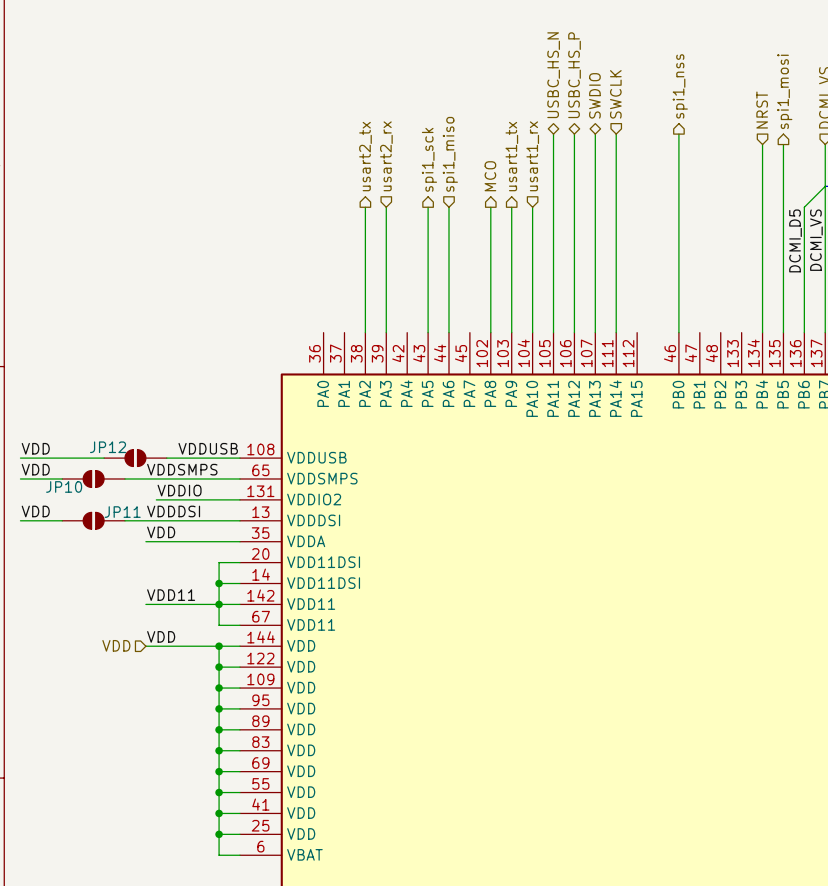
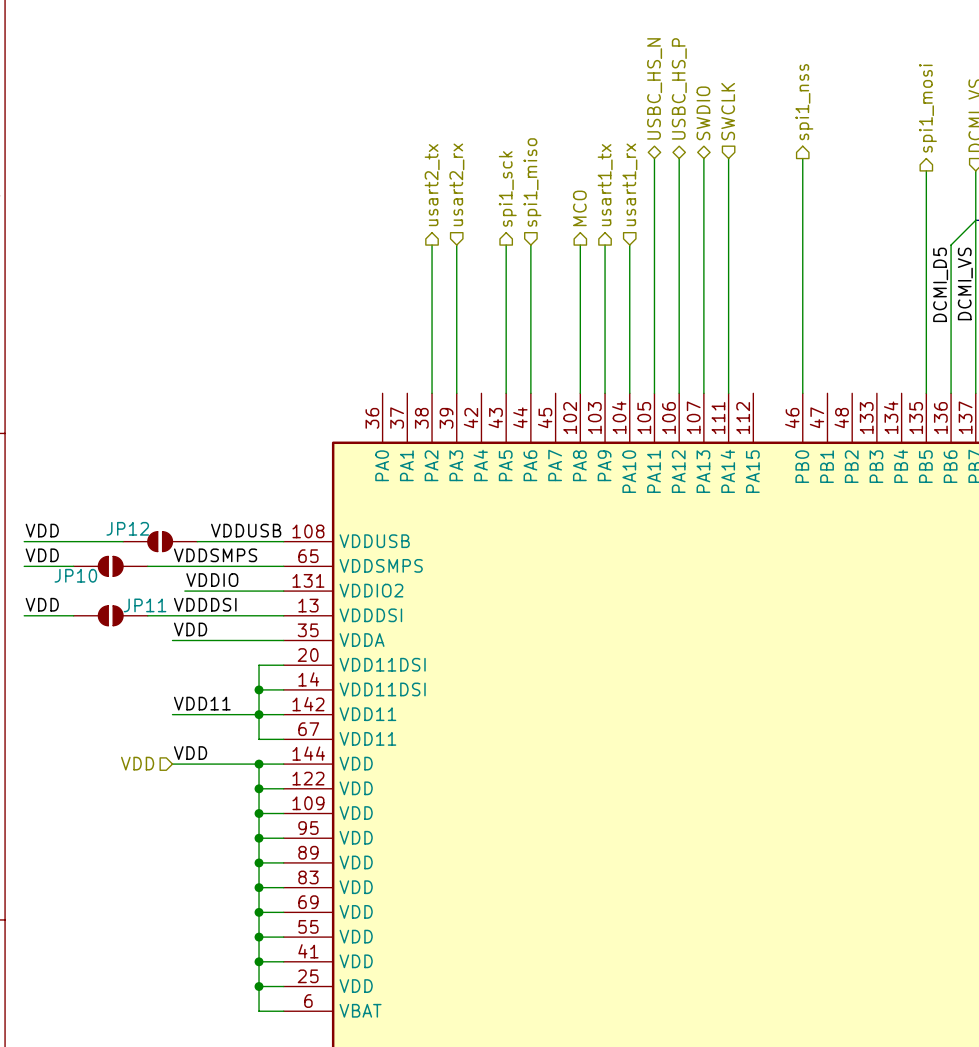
hierarchical label: NRST (762, 110) -> none
wire: (762, 144) (762, 332) -> none

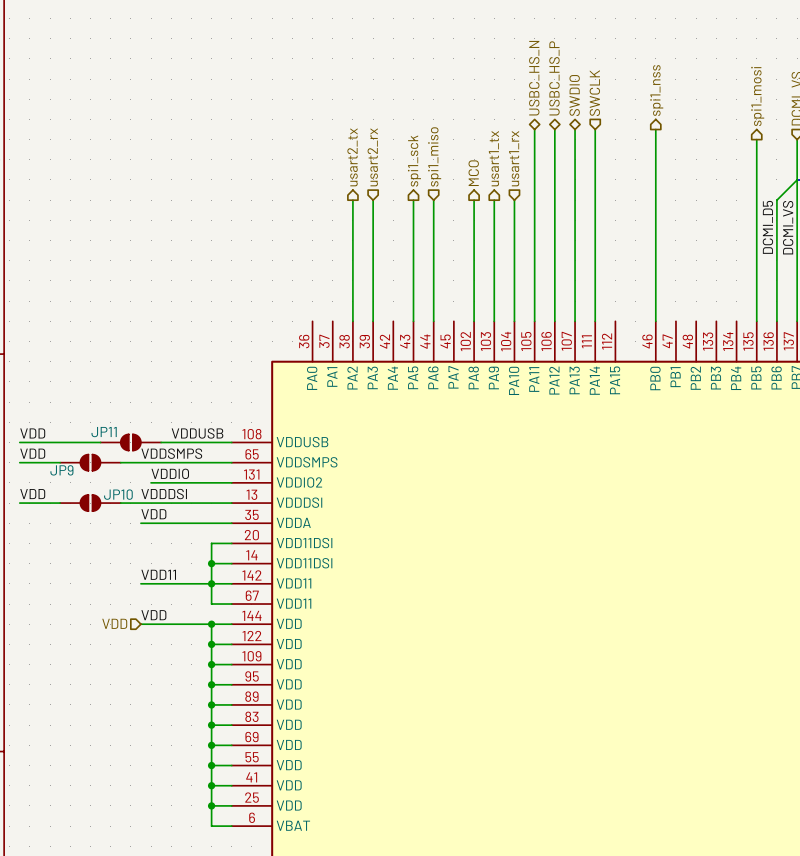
JP12 name: JP12 (127, 528) -> JP11 (104, 432)
JP10 name: JP10 (75, 575) -> JP9 (61, 470)
JP11 name: JP11 (145, 605) -> JP10 (118, 494)

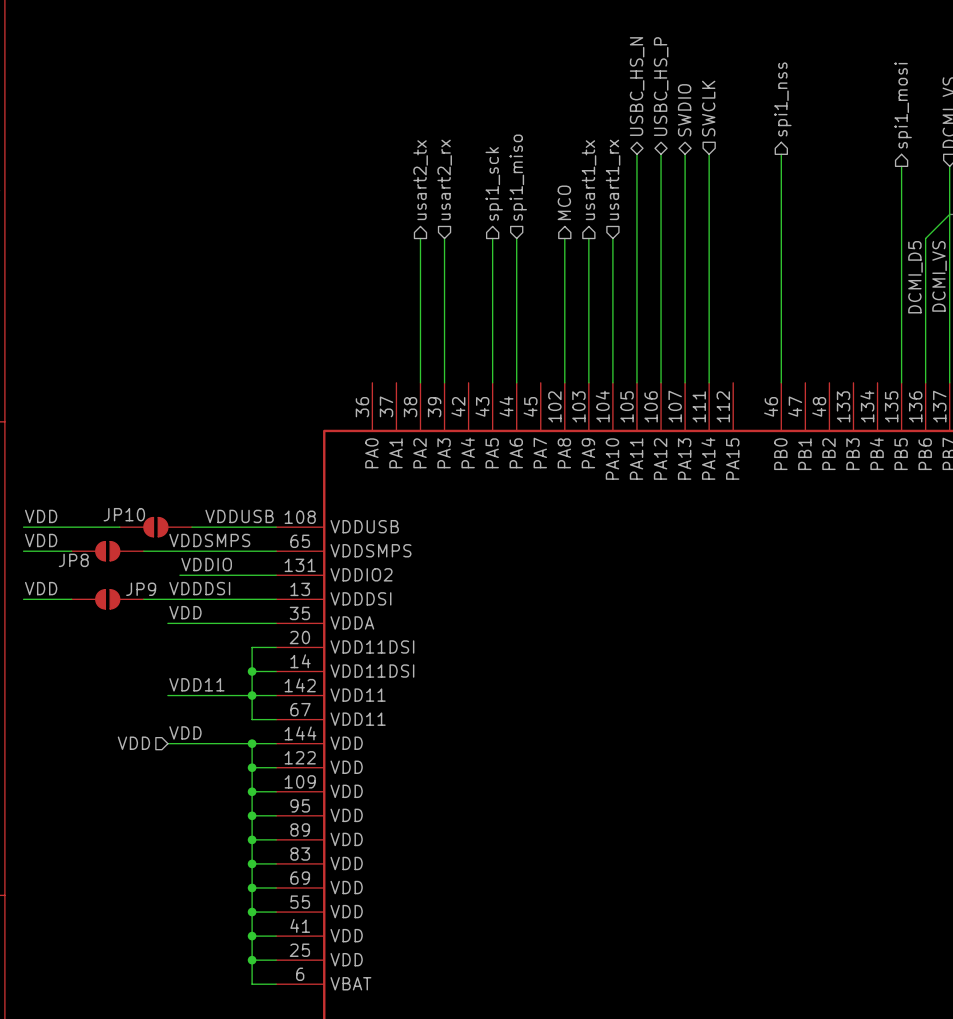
JP11 name: JP11 (104, 432) -> JP10 (124, 514)
JP9 name: JP9 (61, 470) -> JP8 (73, 560)
JP10 name: JP10 (118, 494) -> JP9 (141, 589)

